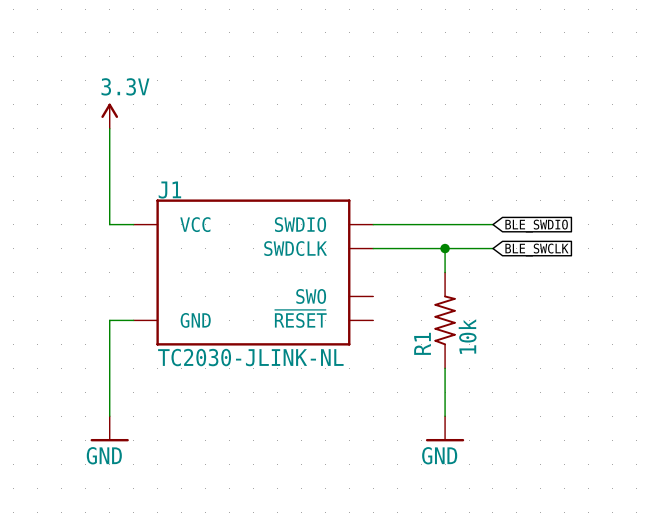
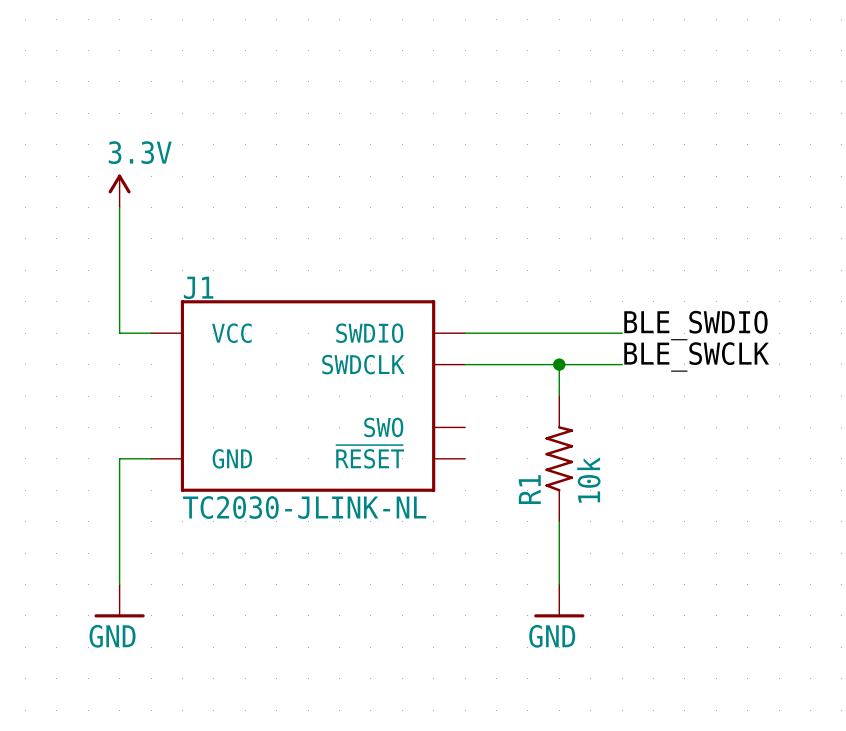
label: none -> BLE_SWDIO (695, 325)
global label: BLE_SWDIO (536, 226) -> none
label: none -> BLE_SWCLK (696, 356)
global label: BLE_SWCLK (536, 250) -> none

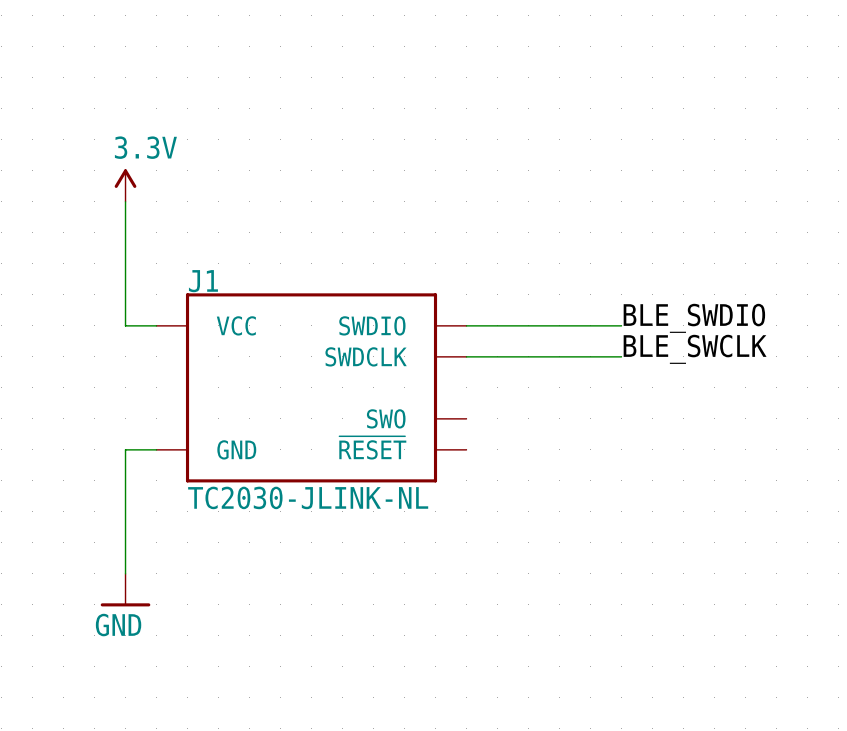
wire: (559, 364) (559, 396) -> none
junction: (559, 364) -> none
R1: 10k (559, 458) -> none
wire: (559, 521) (559, 584) -> none
power symbol: GND (559, 600) -> none

